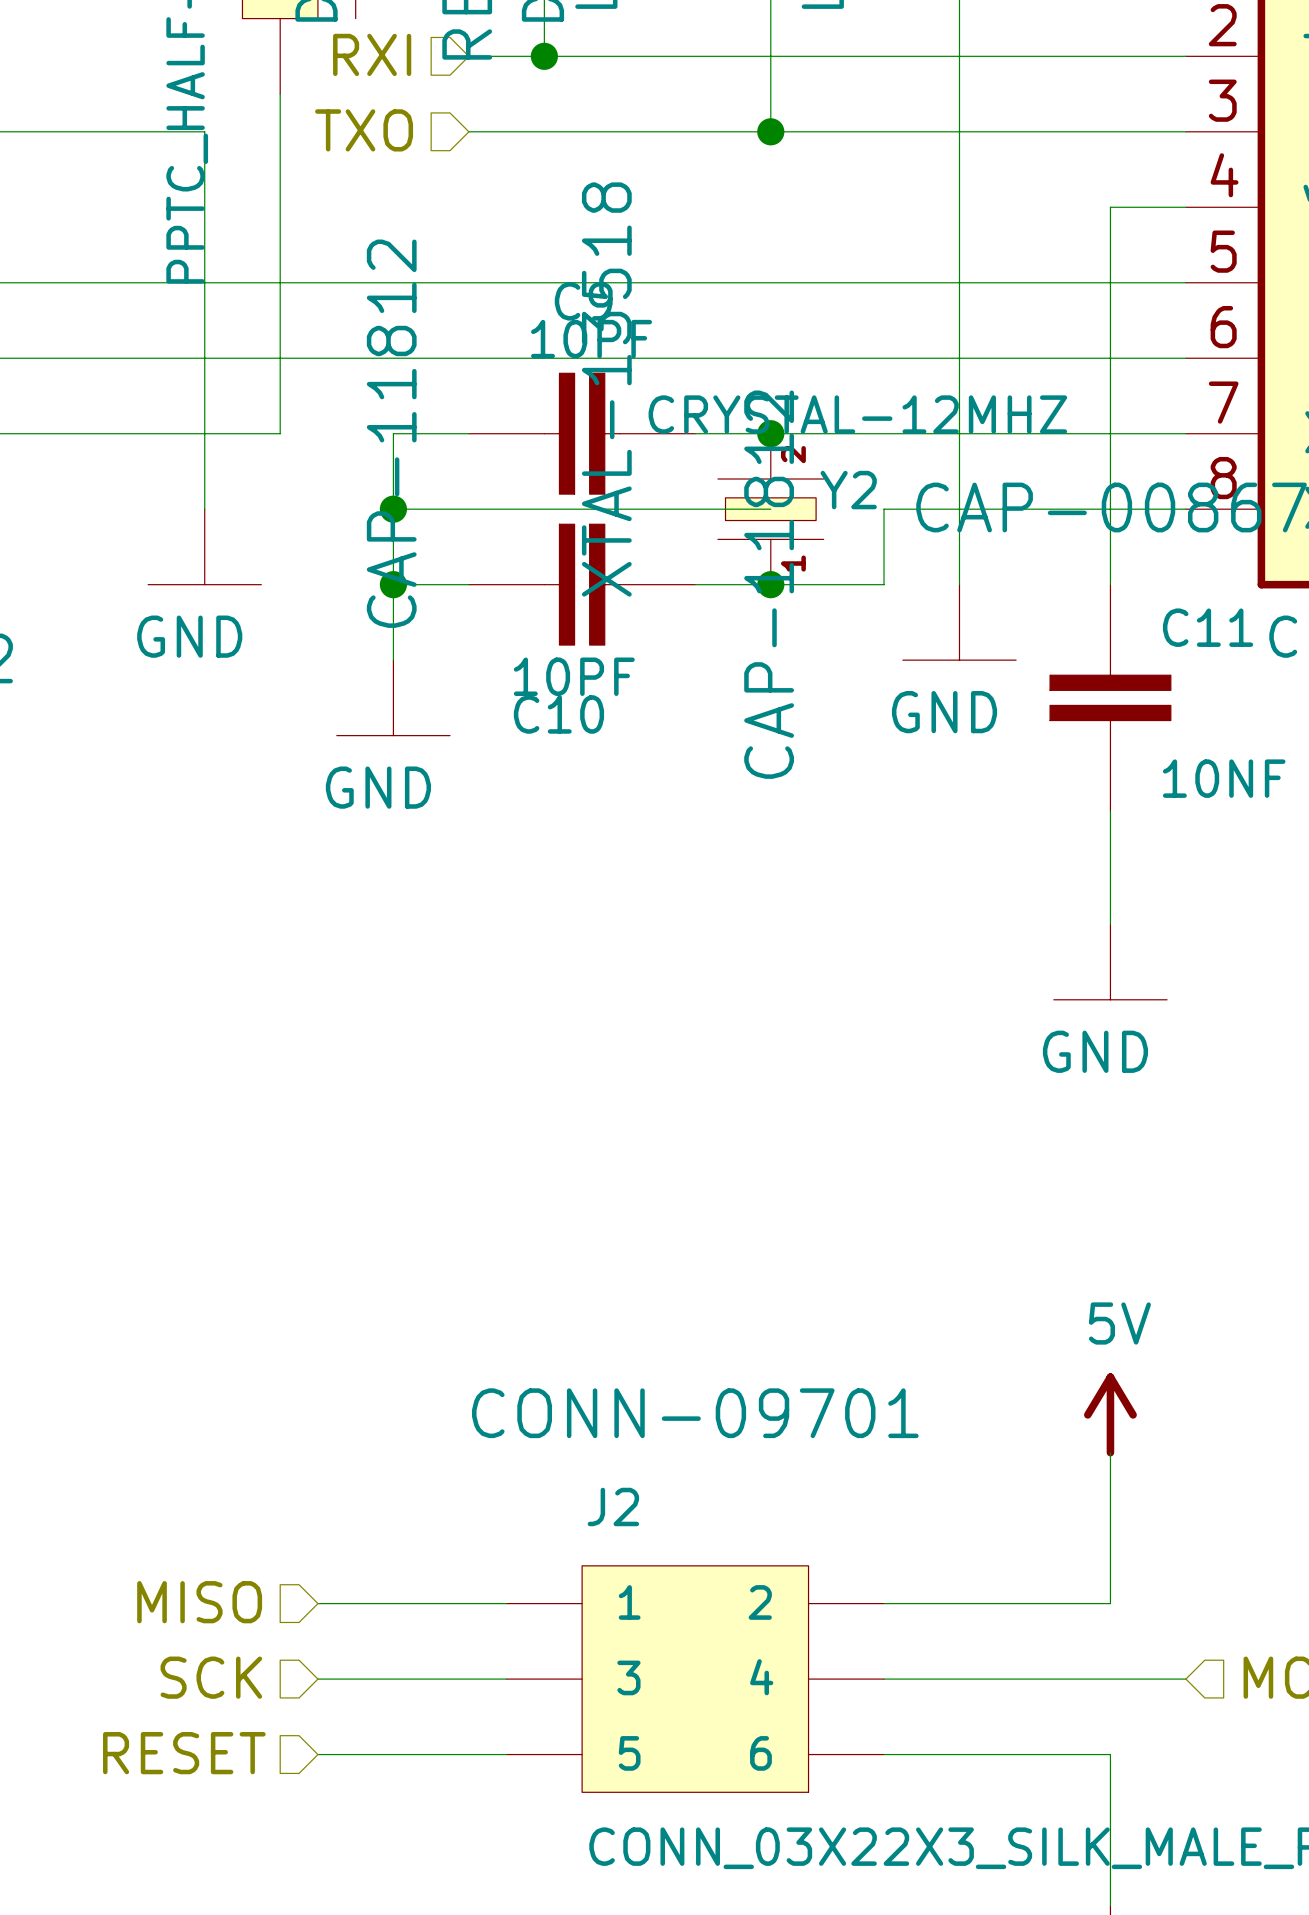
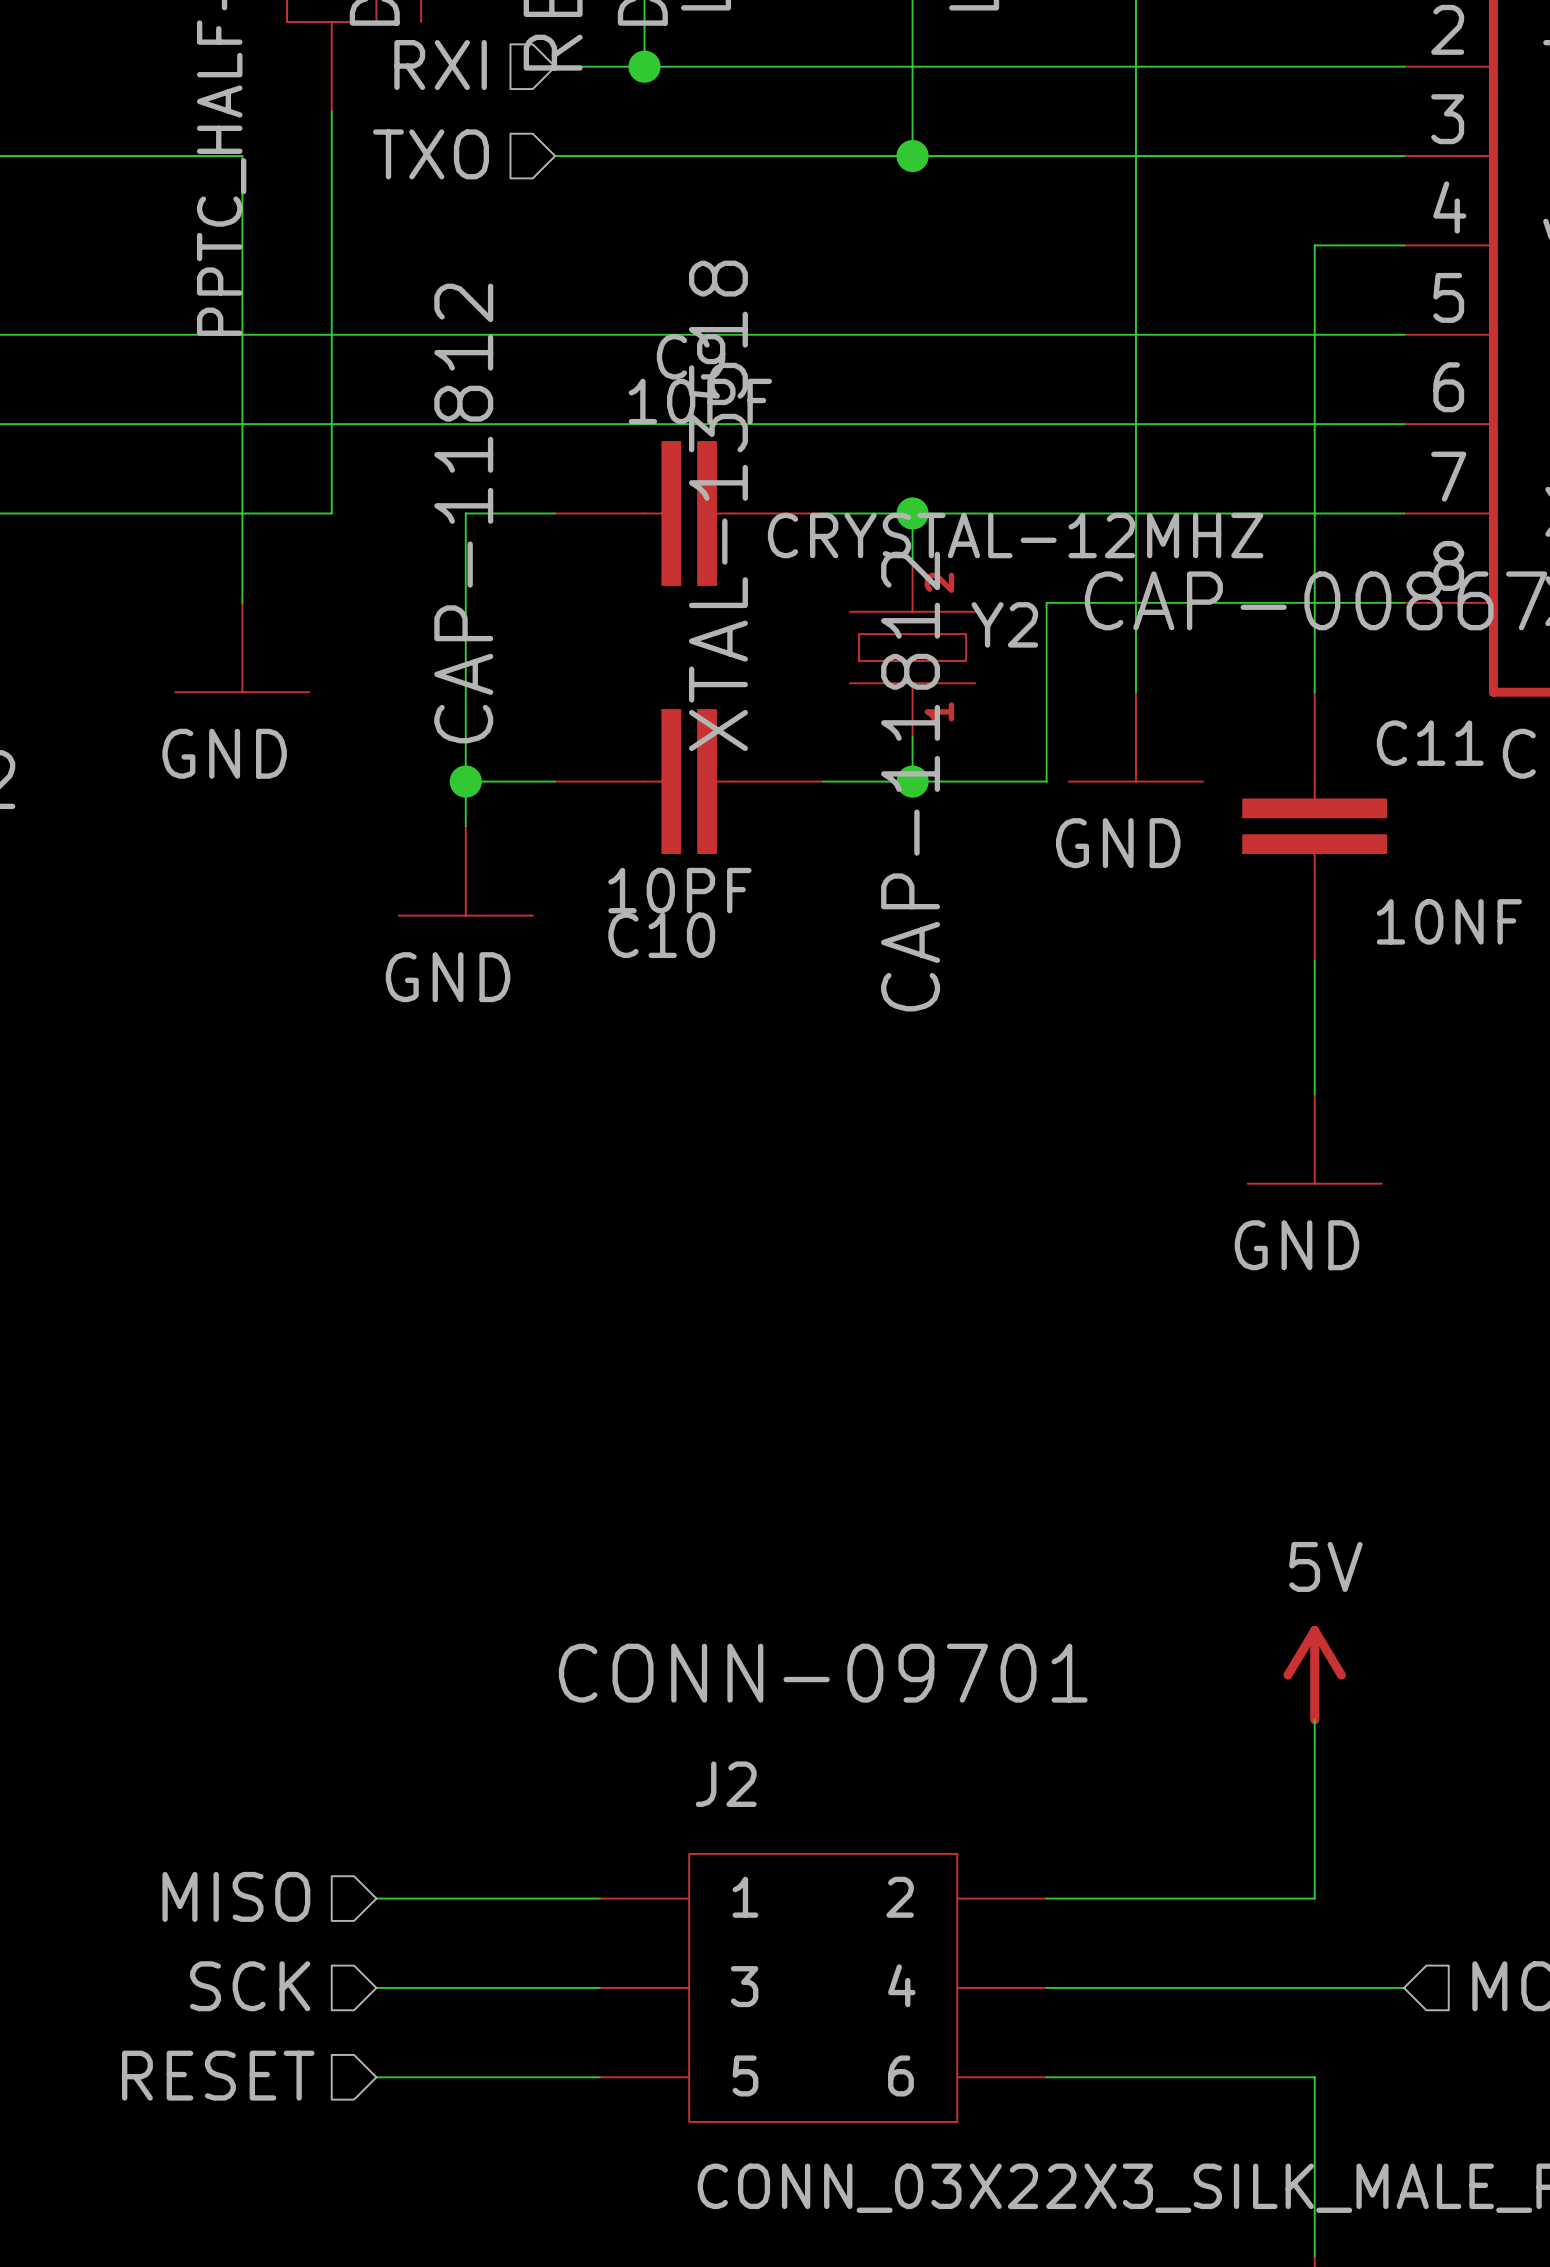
wire: (393, 509) (770, 509) -> none
junction: (393, 509) -> none
Y2 position: (770, 509) -> (912, 647)
wire: (393, 584) (468, 584) -> none
junction: (393, 584) -> none
C10 position: (582, 584) -> (689, 781)
wire: (695, 584) (884, 584) -> (823, 781) (1046, 781) (1046, 692)
junction position: (770, 584) -> (912, 781)
wire: none -> (912, 736) (912, 781)
junction: none -> (465, 781)
wire: none -> (555, 781) (465, 781) (465, 826)
power symbol position: GND (393, 697) -> GND (465, 870)

